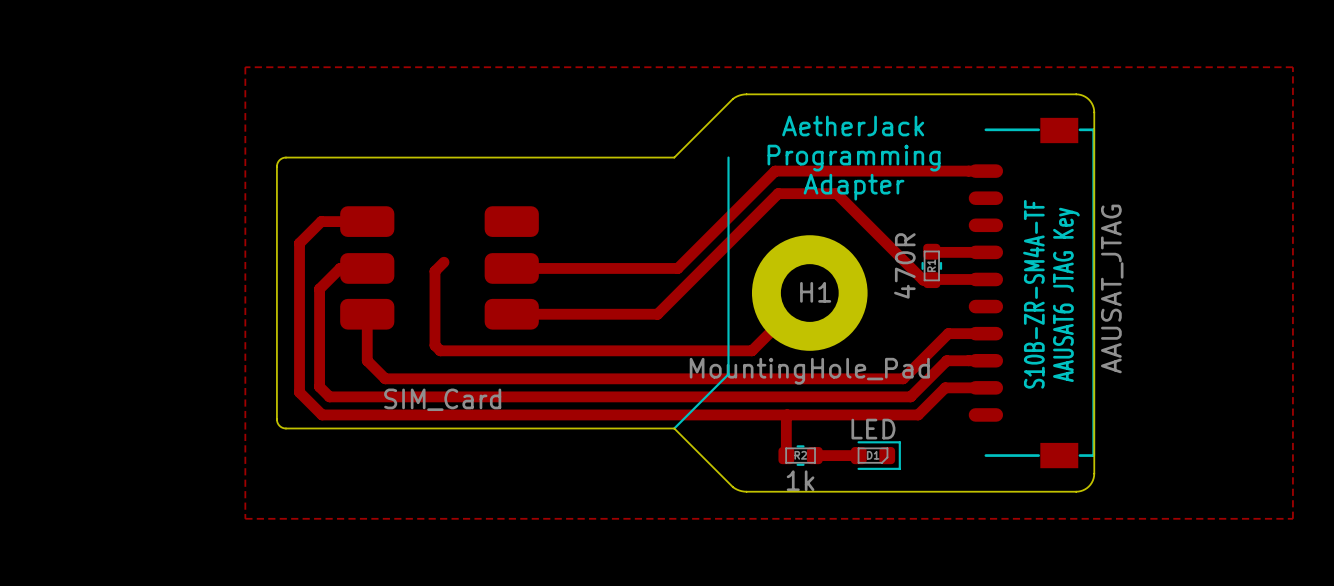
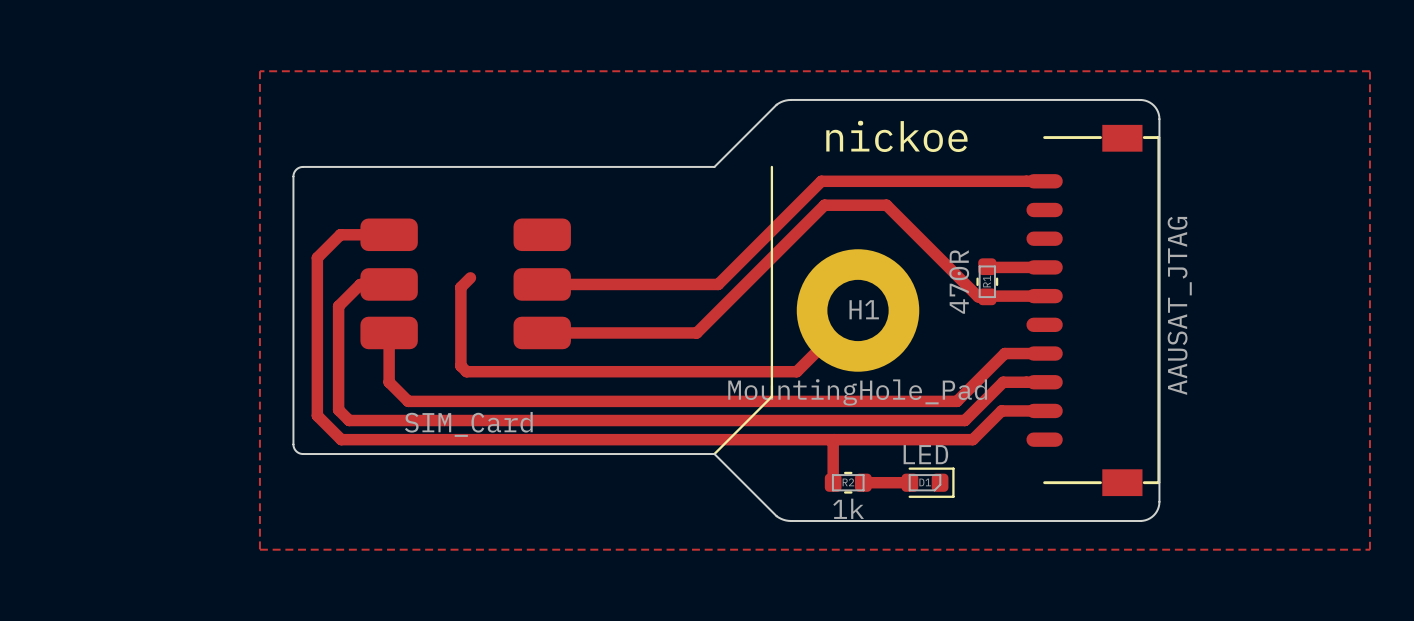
text: AetherJack (853, 125) -> nickoe (896, 136)
text: Programming (854, 158) -> none
text: Adapter (854, 187) -> none
text: S10B-ZR-SM4A-TF (1033, 294) -> none
text: AAUSAT6 JTAG Key (1066, 294) -> none

